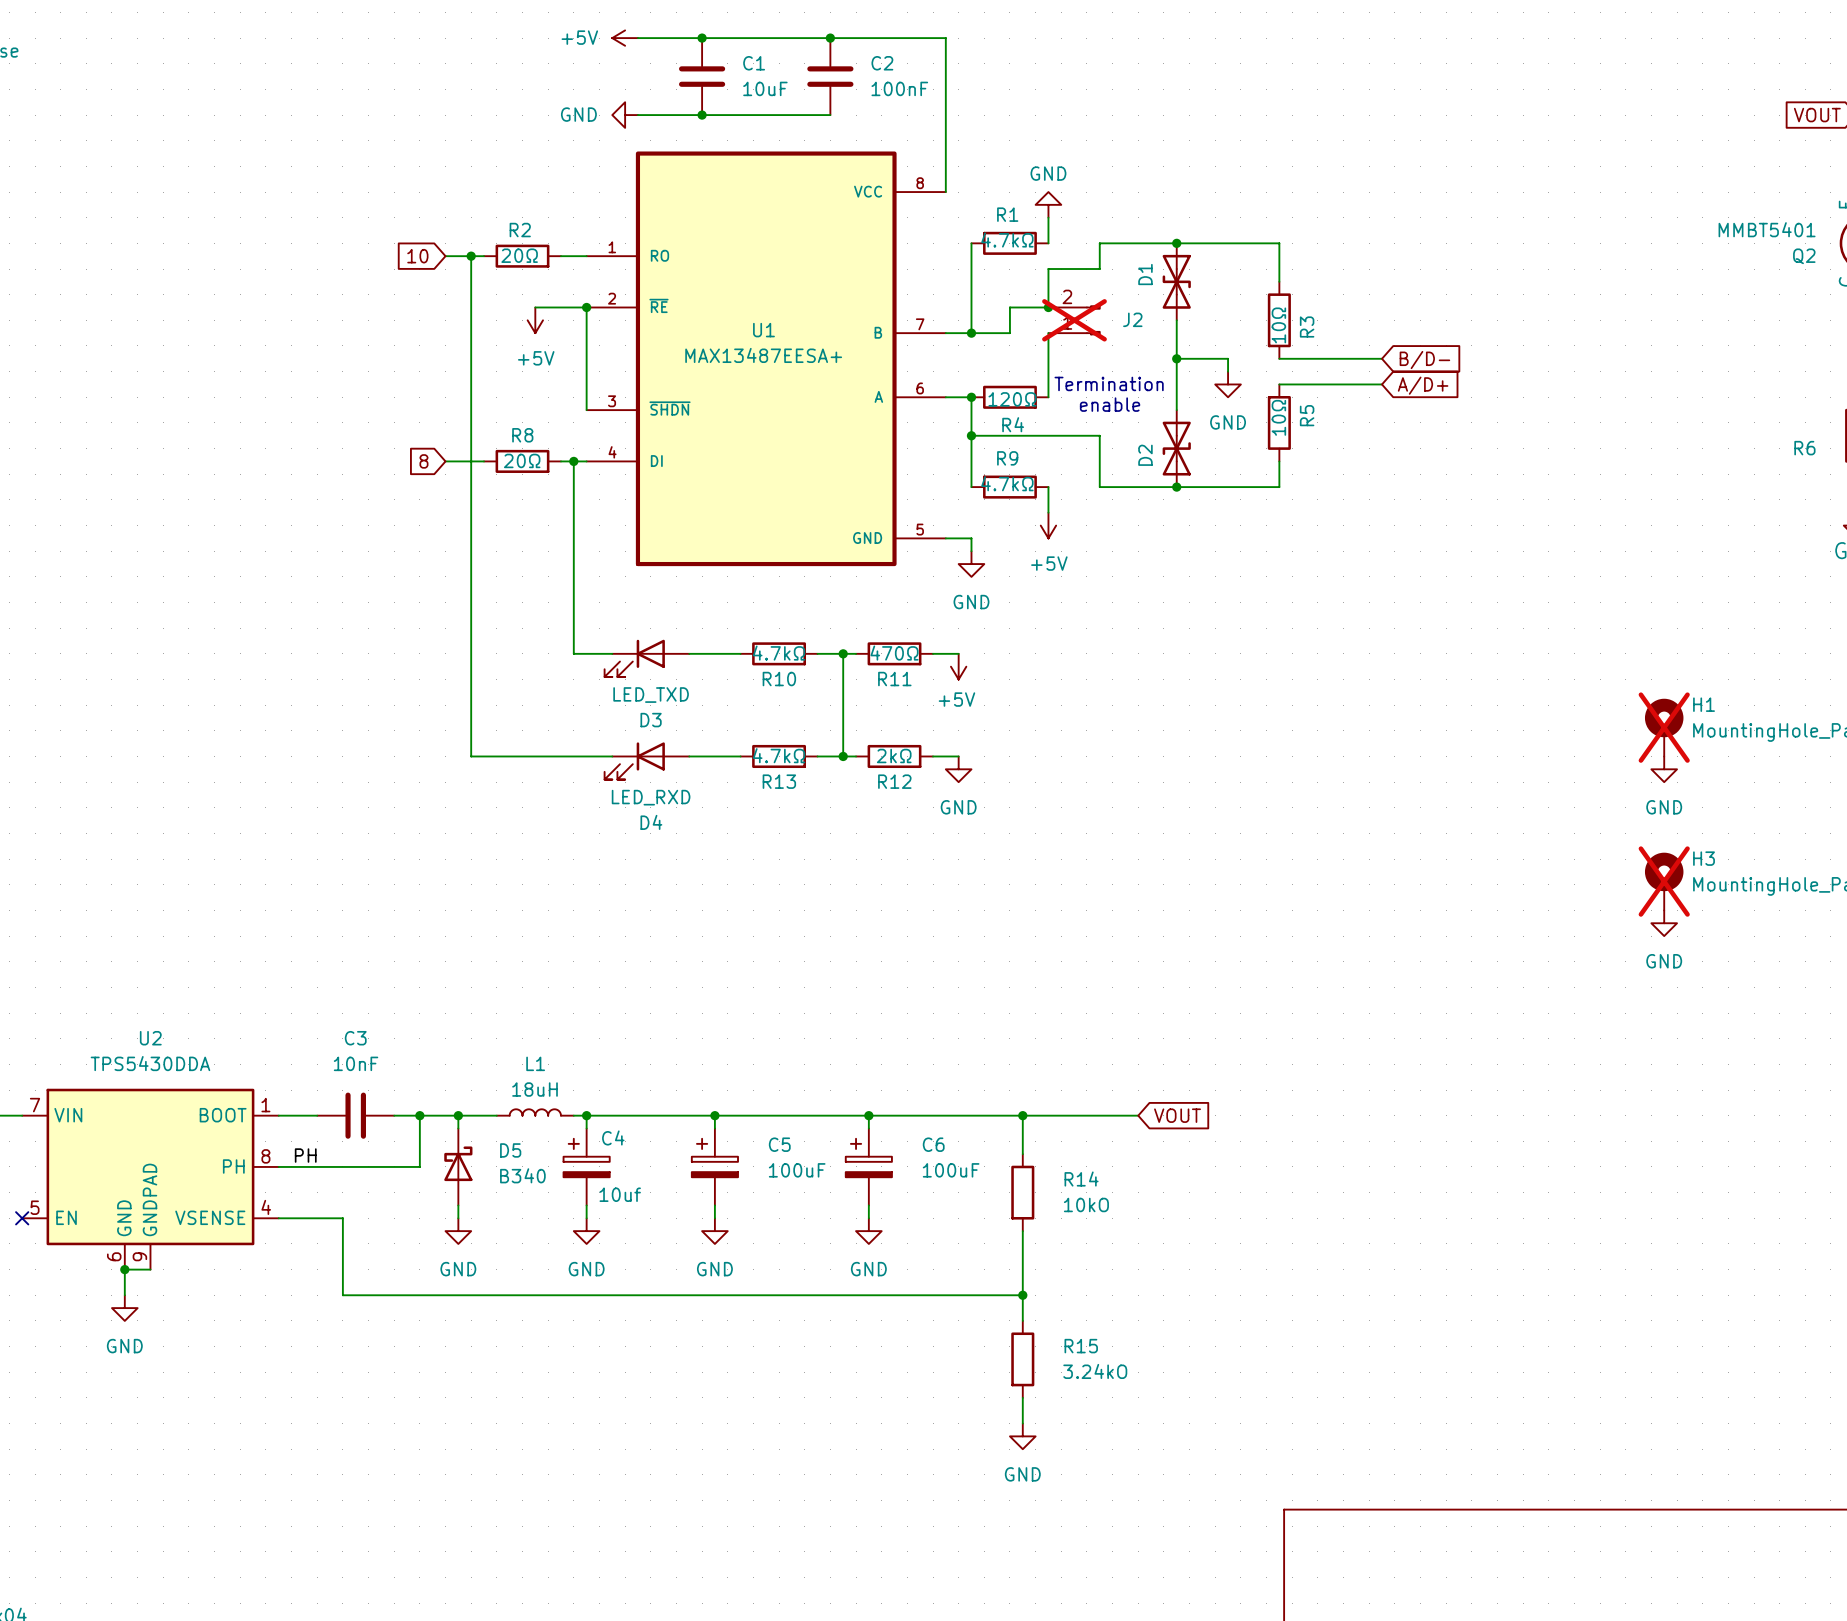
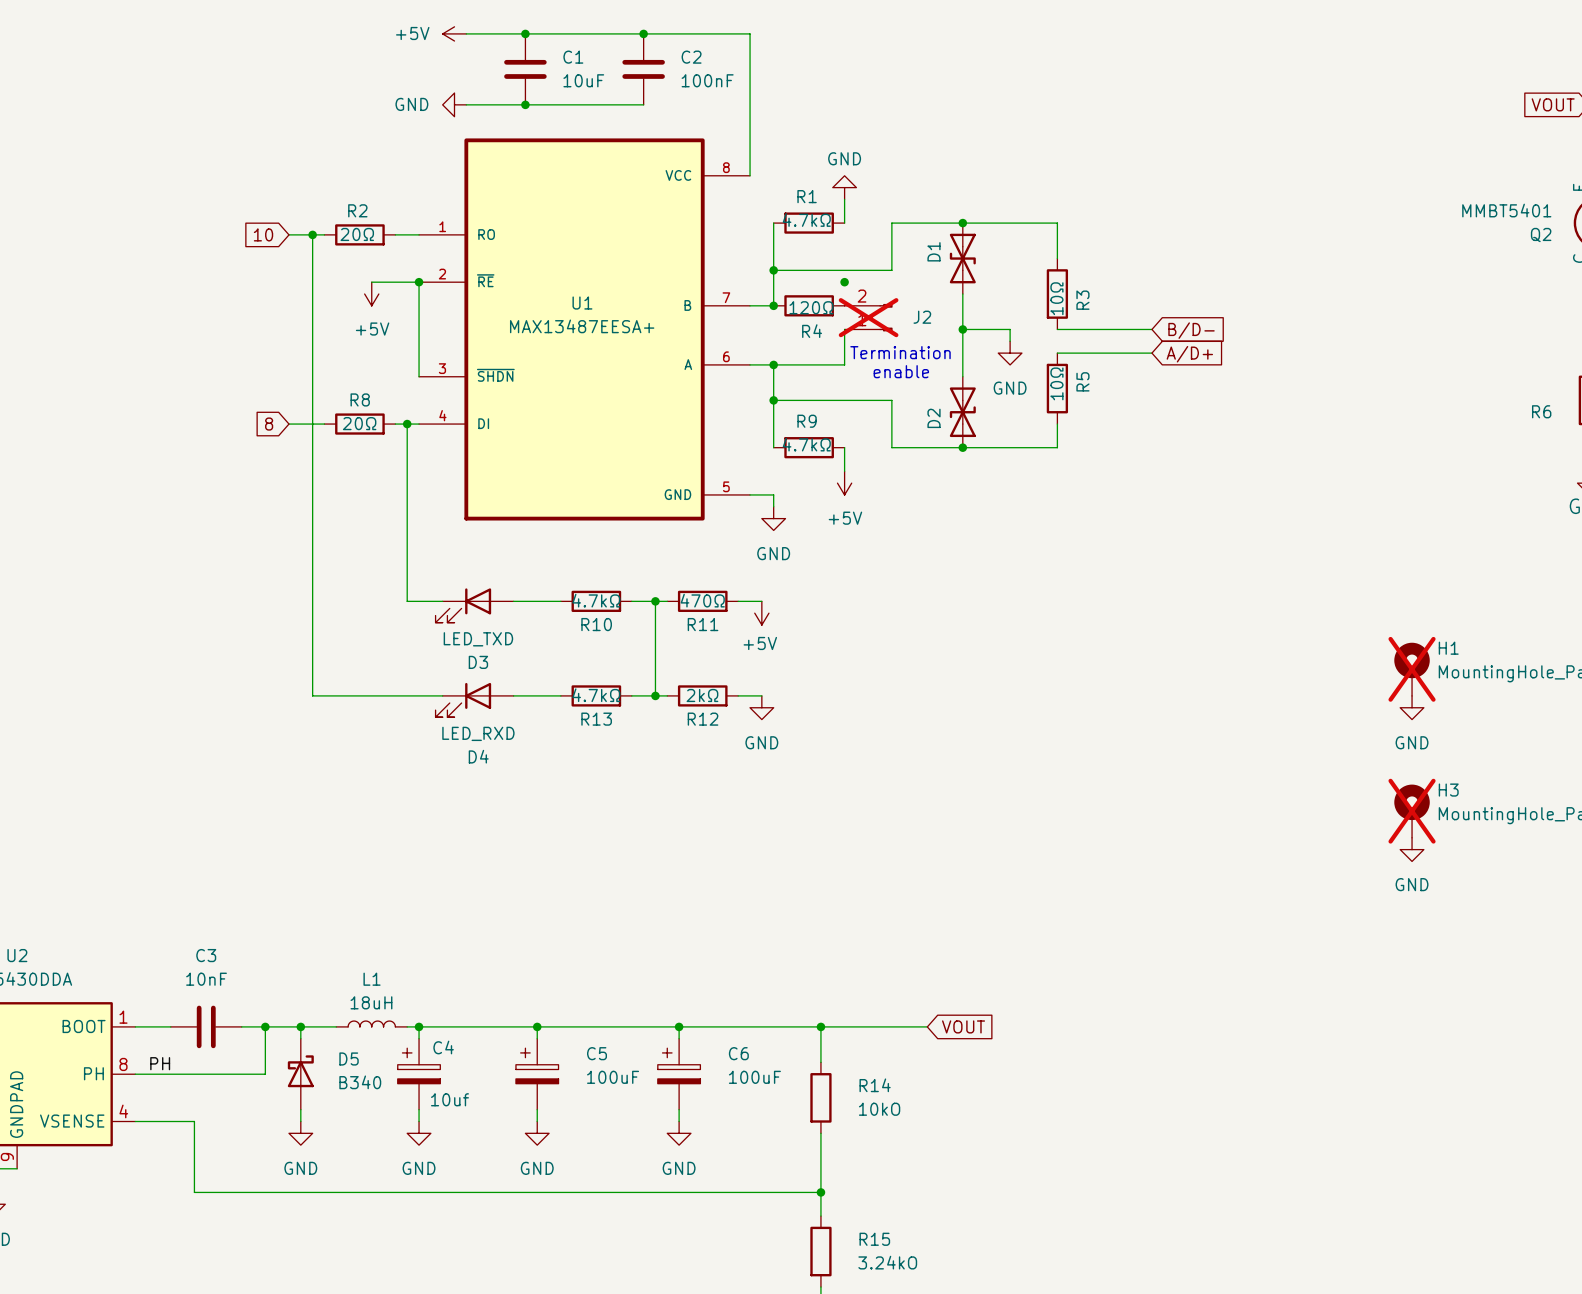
wire: (1099, 269) (1048, 269) (1048, 307) (1009, 307) (1009, 333) (971, 333) -> (891, 246) (891, 270) (773, 270)
junction: none -> (773, 270)
J2 position: (1074, 320) -> (868, 317)
wire: (1048, 333) (1048, 358) -> none
wire: none -> (773, 364) (844, 364)
R4 position: (1009, 397) -> (809, 305)

